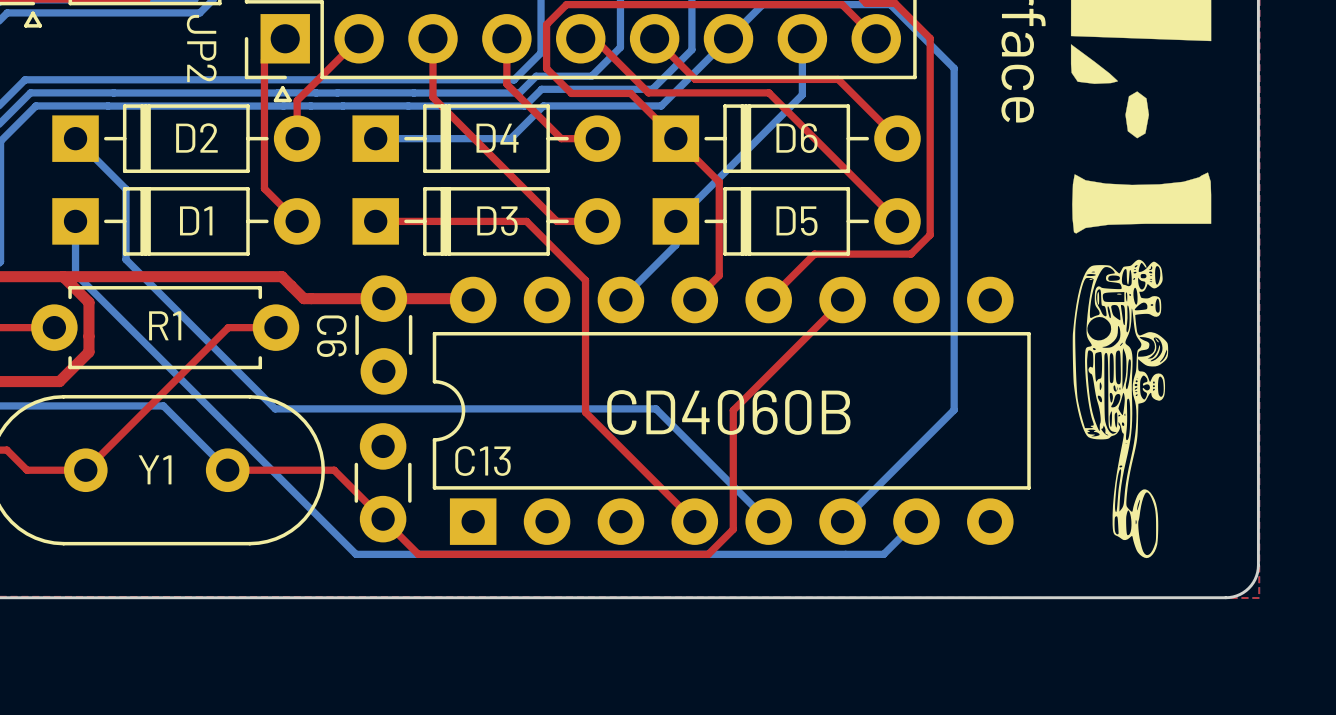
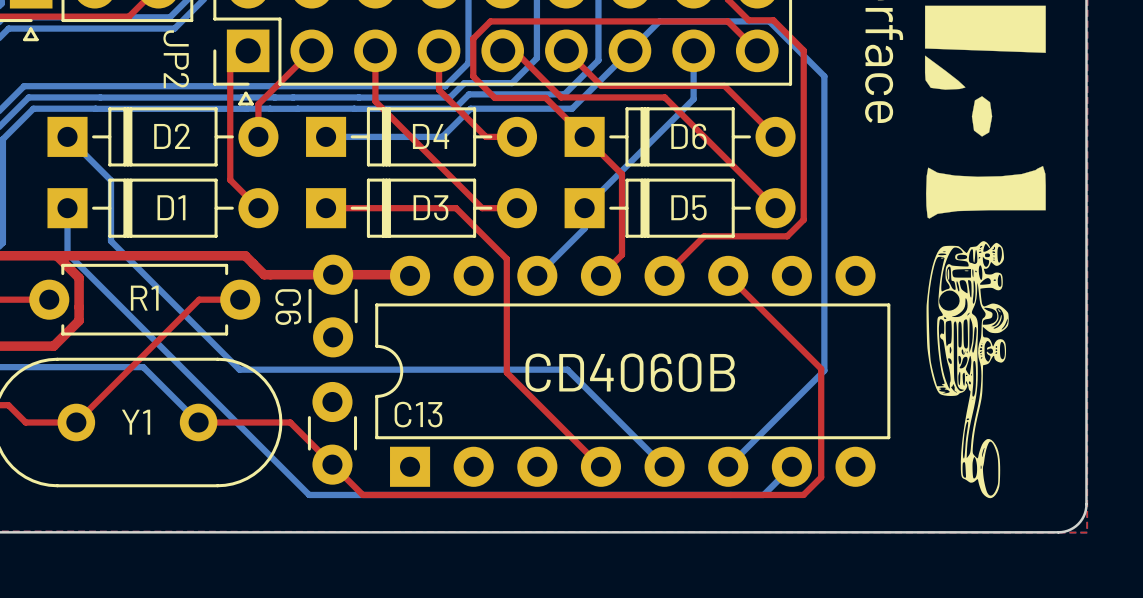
top track: (842, 300) (733, 410) (733, 529) (708, 554) -> (728, 275) (821, 368) (821, 477) (803, 494) (612, 494)

